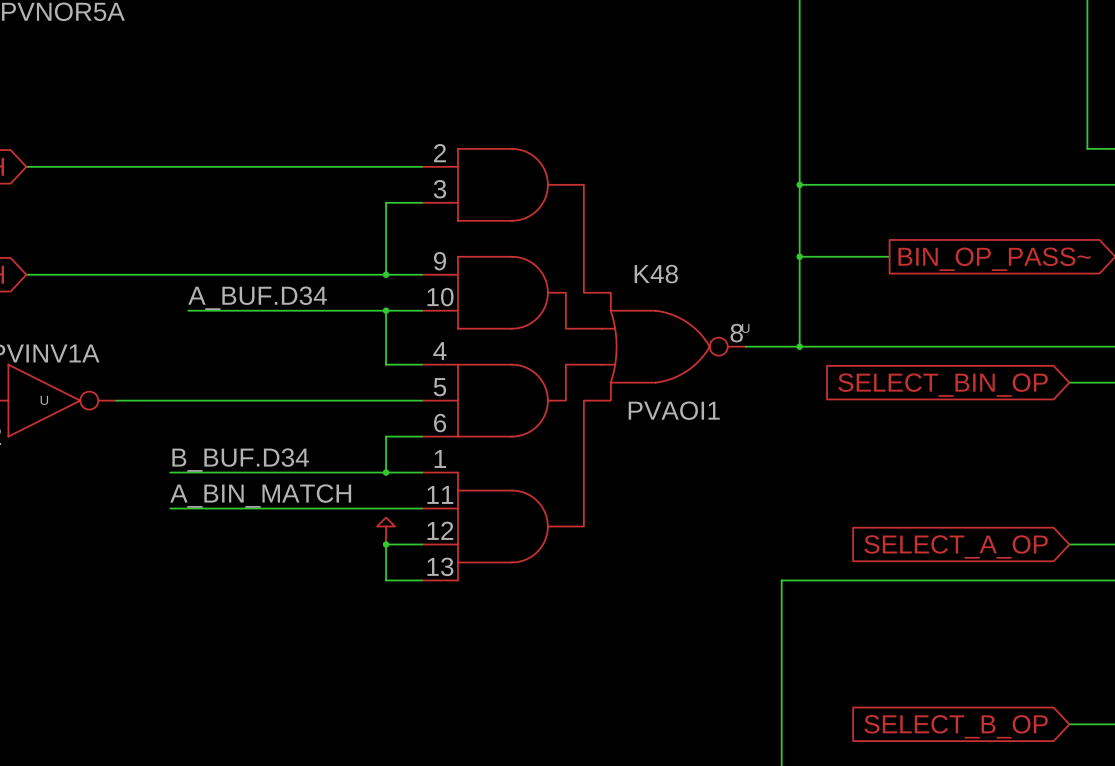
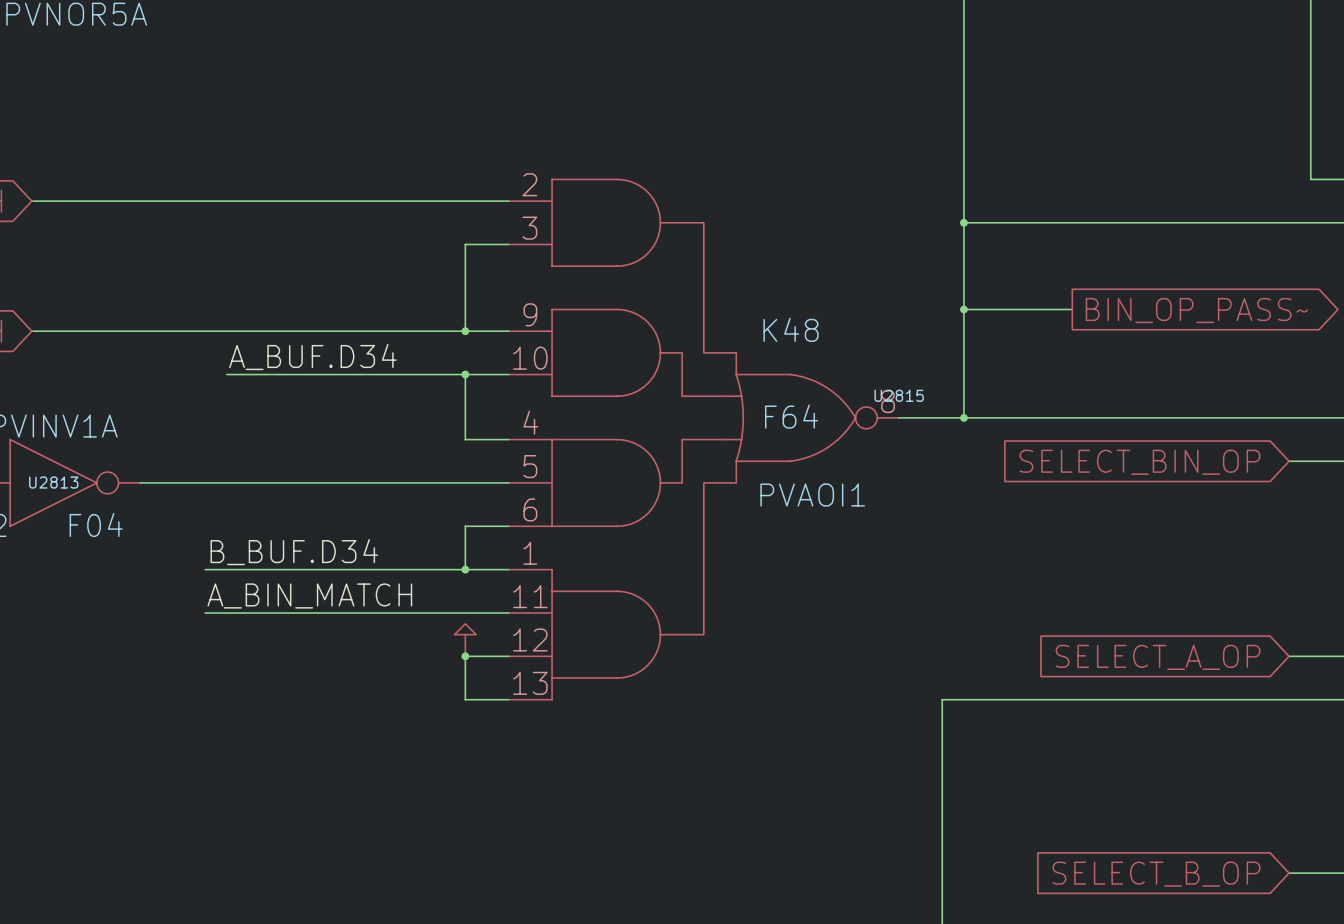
U name: U (745, 328) -> U2815 (899, 395)
U value: none -> F64 (791, 416)
U name: U (44, 400) -> U2813 (53, 482)
U value: none -> F04 (96, 524)

